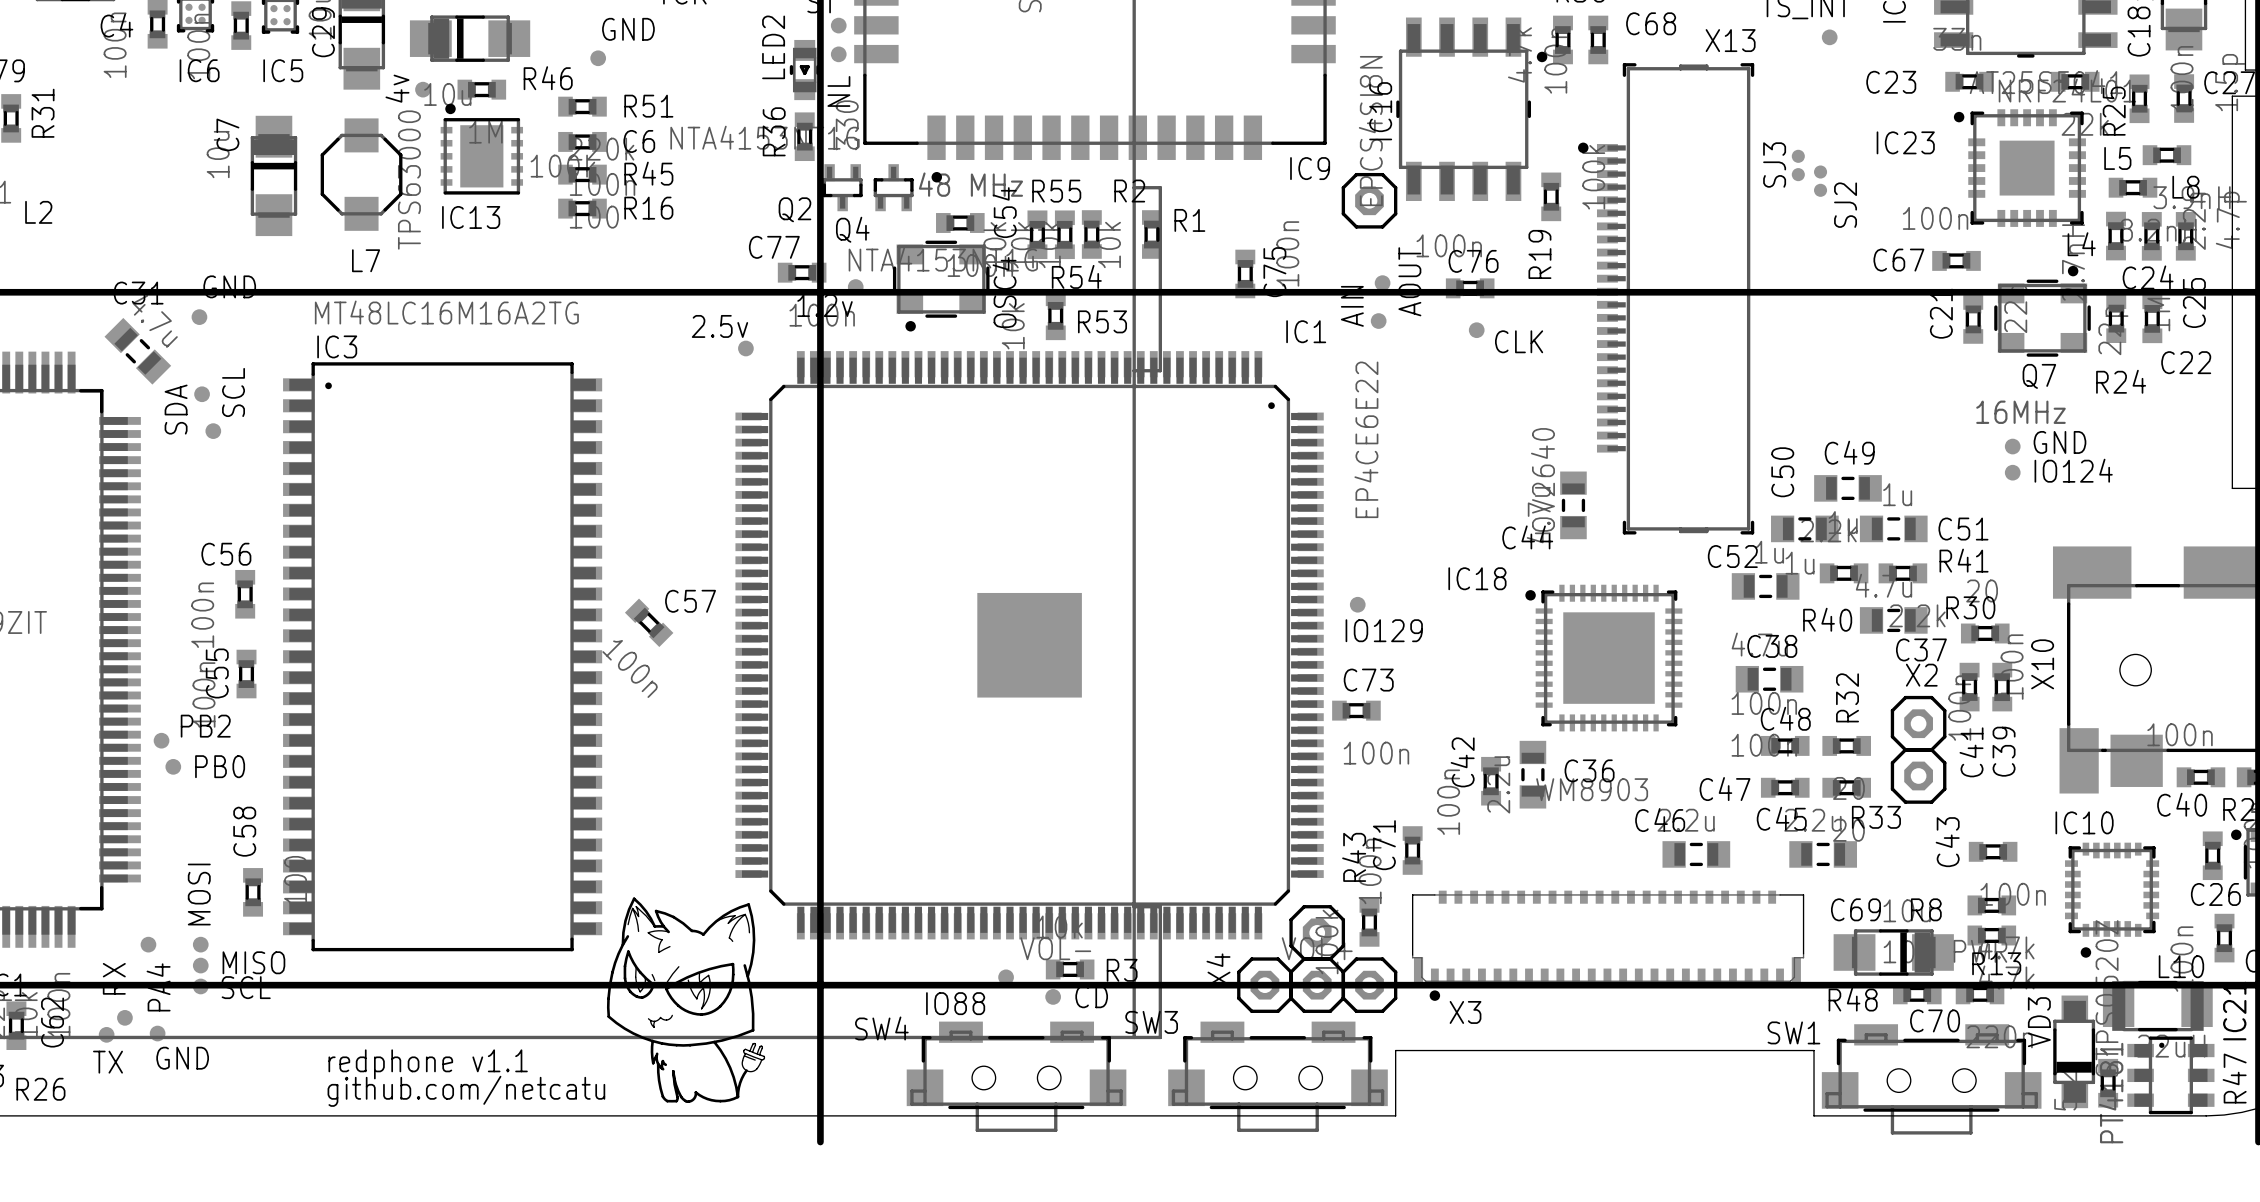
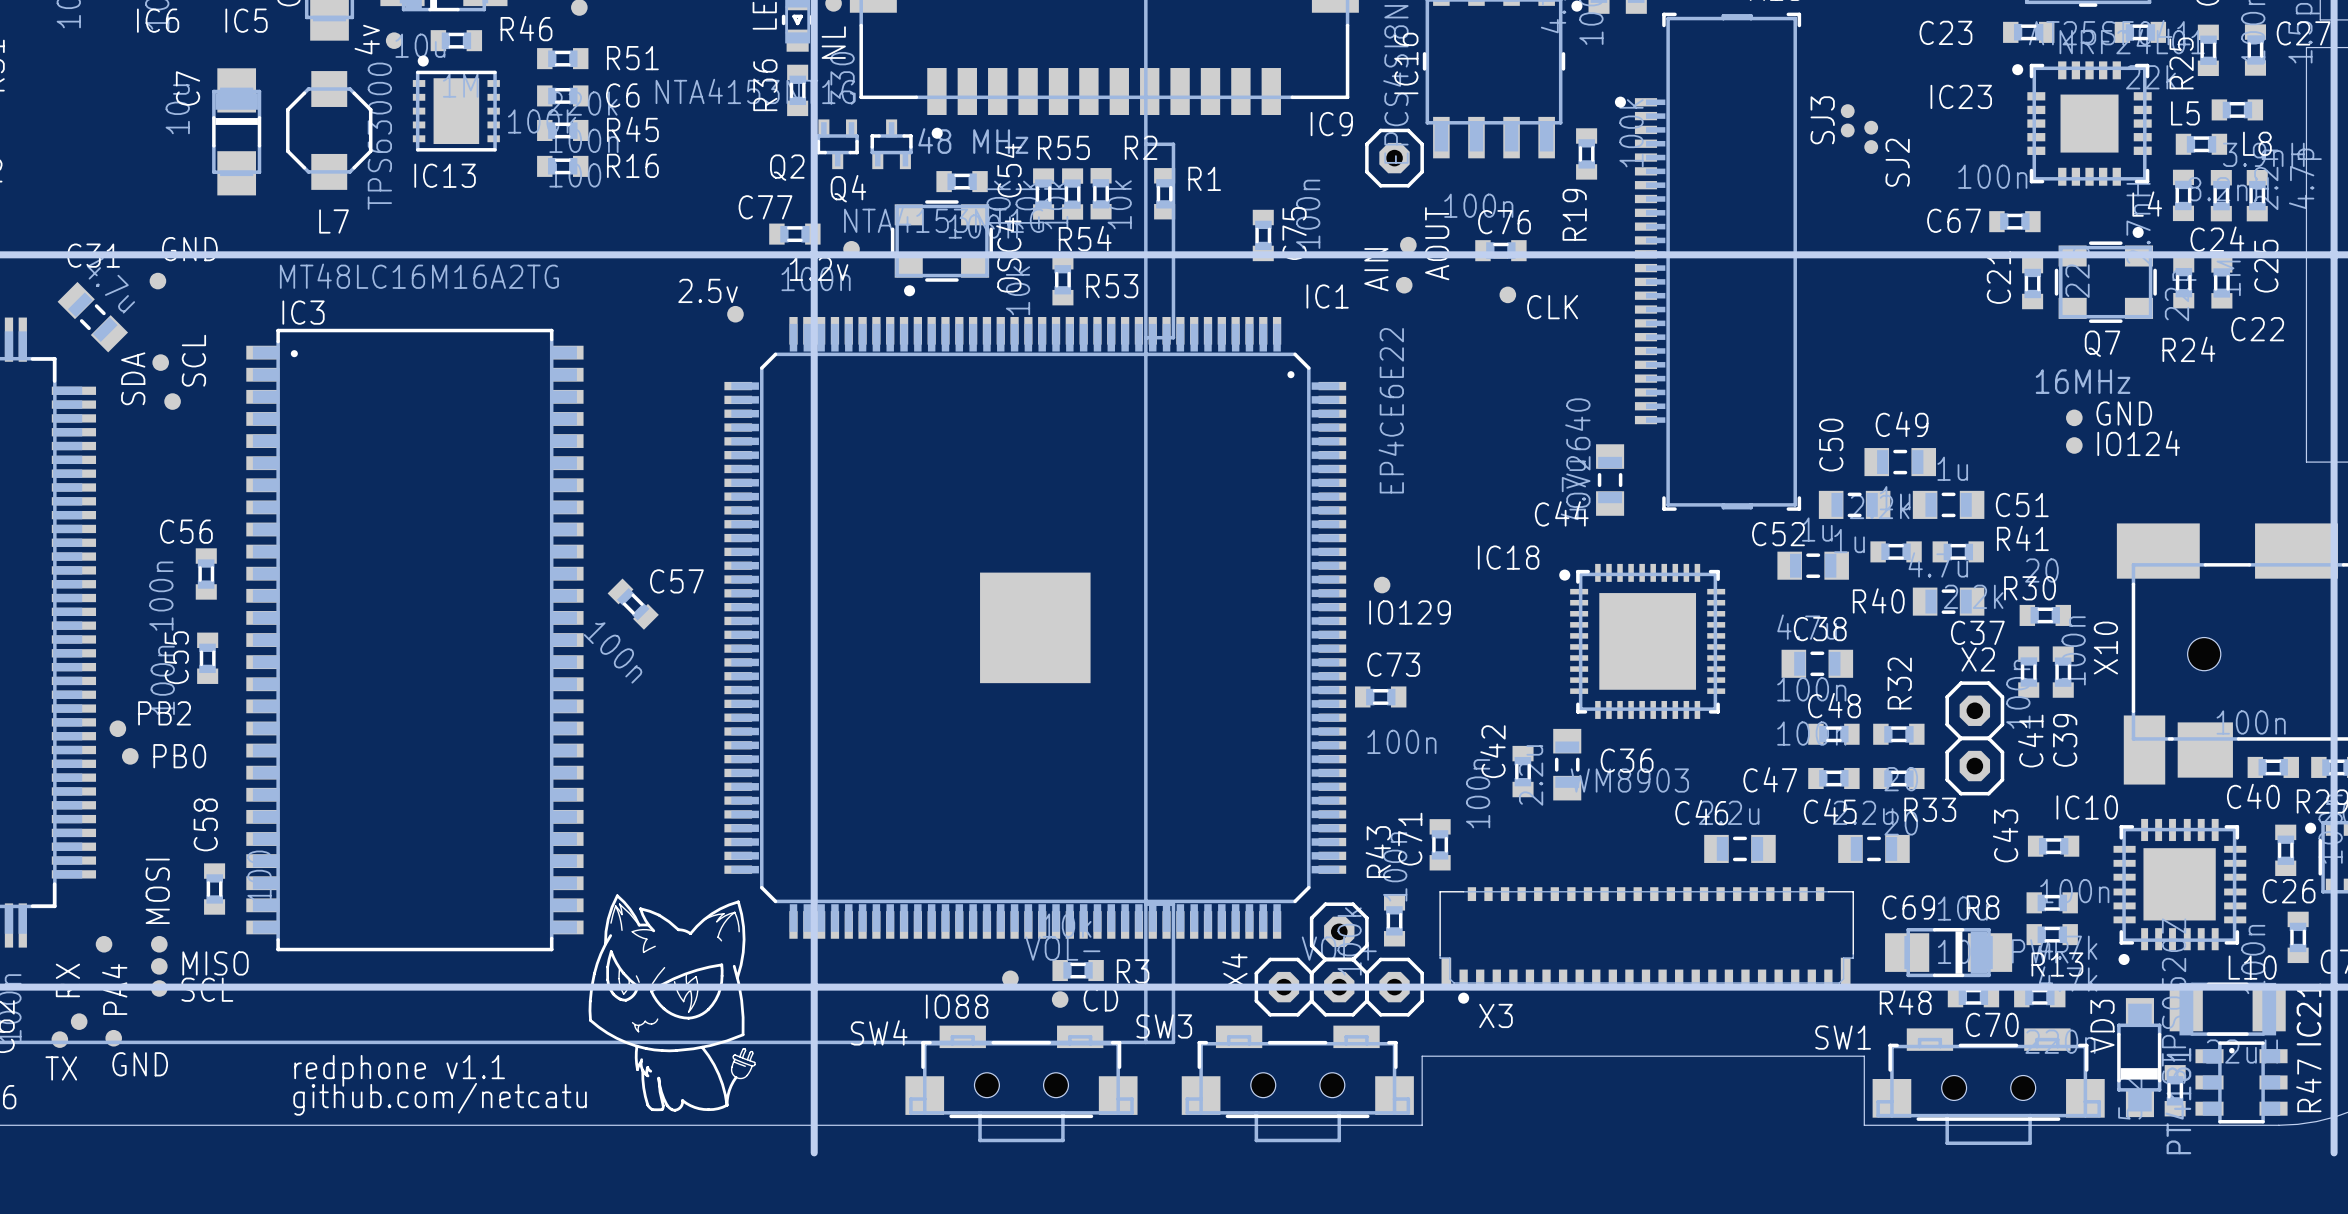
IC10 name position: IC10 (2084, 822) -> IC10 (2087, 807)
IC10 footprint: [2065, 842, 2160, 958] -> [2113, 818, 2247, 966]

